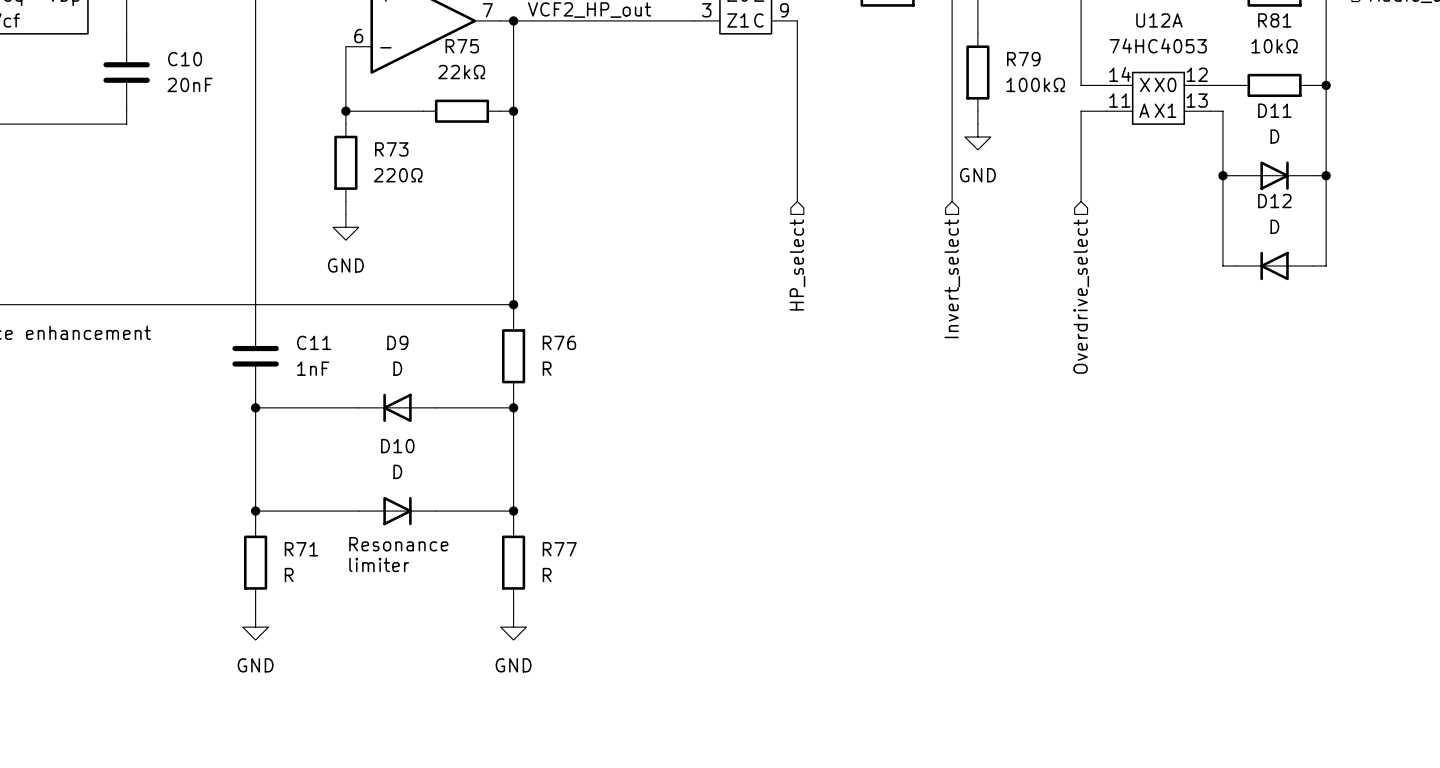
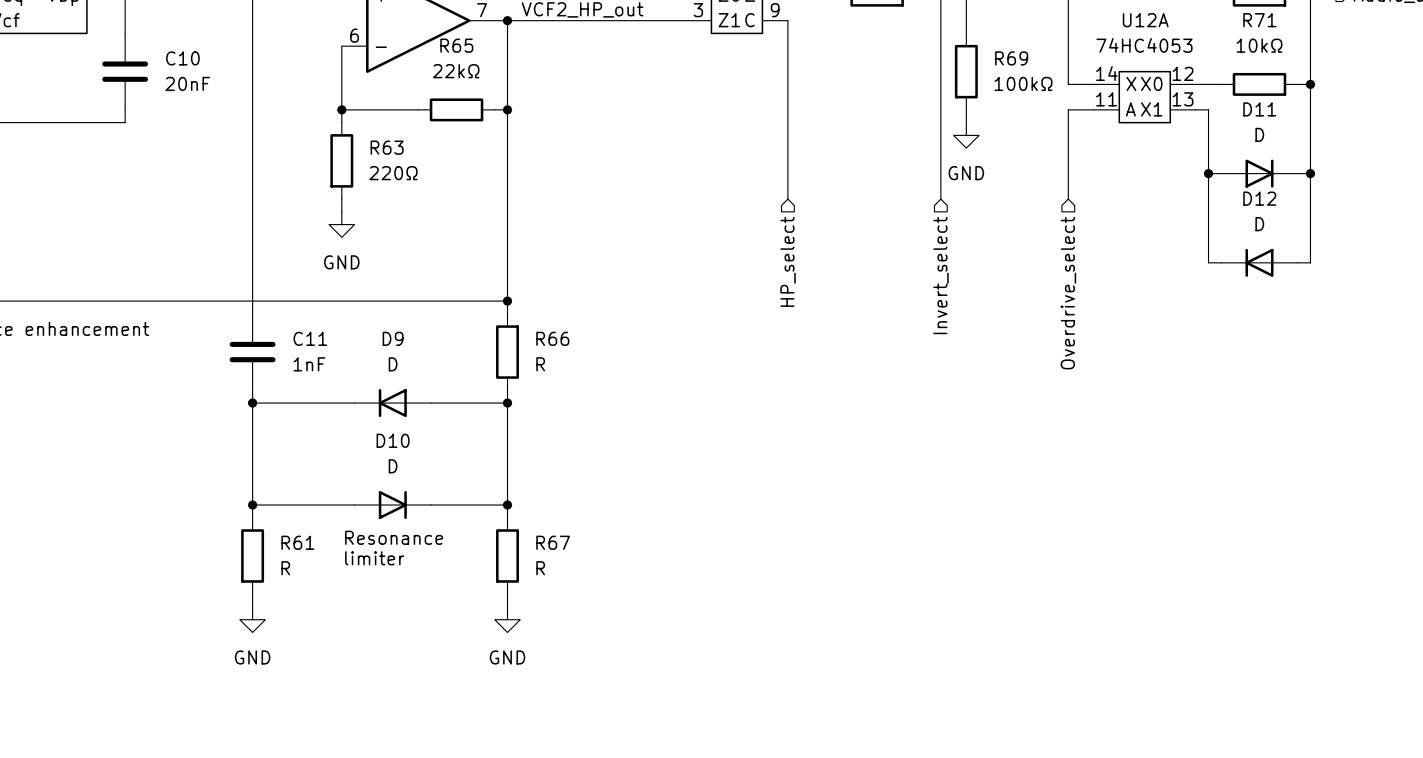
R81 name: R81 (1274, 20) -> R71 (1259, 20)
R75 name: R75 (462, 46) -> R65 (456, 45)
R79 name: R79 (1023, 59) -> R69 (1011, 58)
R73 name: R73 (391, 149) -> R63 (387, 147)
R76 name: R76 (559, 342) -> R66 (552, 338)
R71 name: R71 (301, 549) -> R61 (297, 542)
R77 name: R77 (559, 549) -> R67 (553, 542)

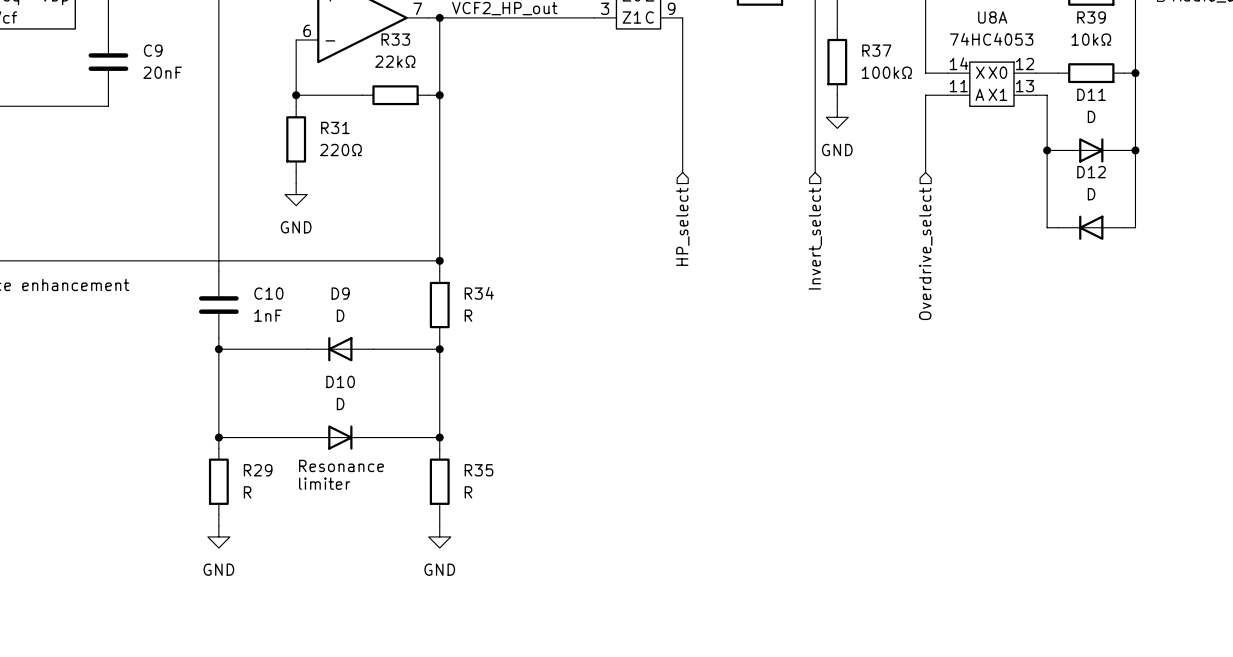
U12A name: U12A (1145, 20) -> U8A (992, 17)
R71 name: R71 (1259, 20) -> R39 (1091, 17)
R65 name: R65 (456, 45) -> R33 (395, 39)
C10 name: C10 (182, 58) -> C9 (153, 50)
R69 name: R69 (1011, 58) -> R37 (876, 50)
R63 name: R63 (387, 147) -> R31 (335, 127)
C11 name: C11 (310, 338) -> C10 (268, 293)
R66 name: R66 (552, 338) -> R34 (479, 293)
R61 name: R61 (297, 542) -> R29 (258, 470)
R67 name: R67 (553, 542) -> R35 (478, 470)

